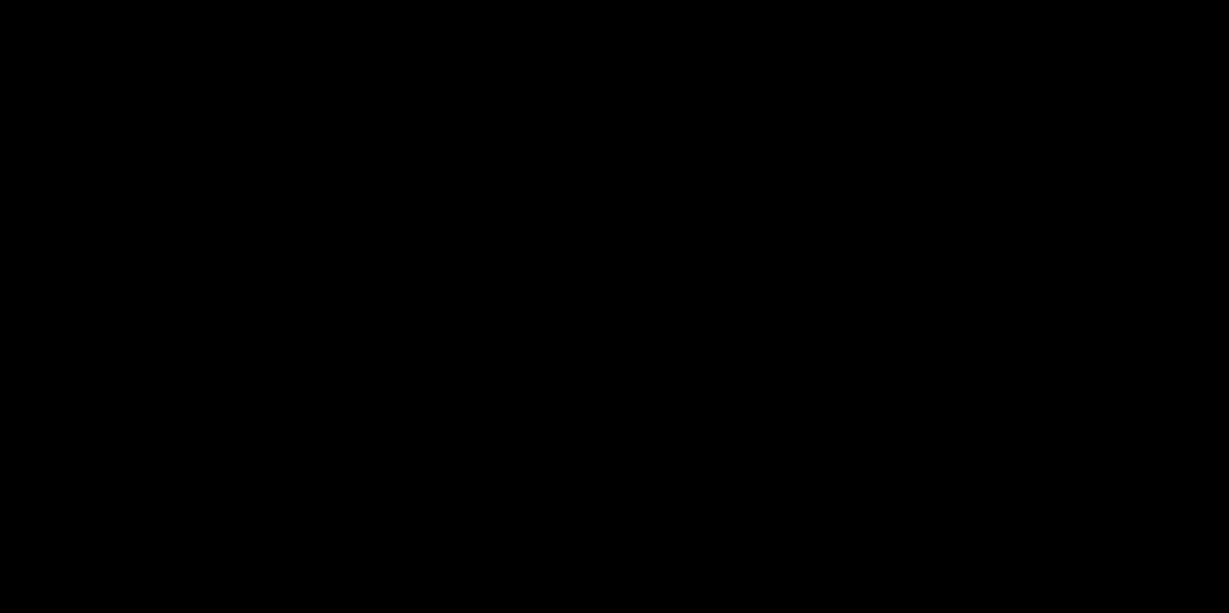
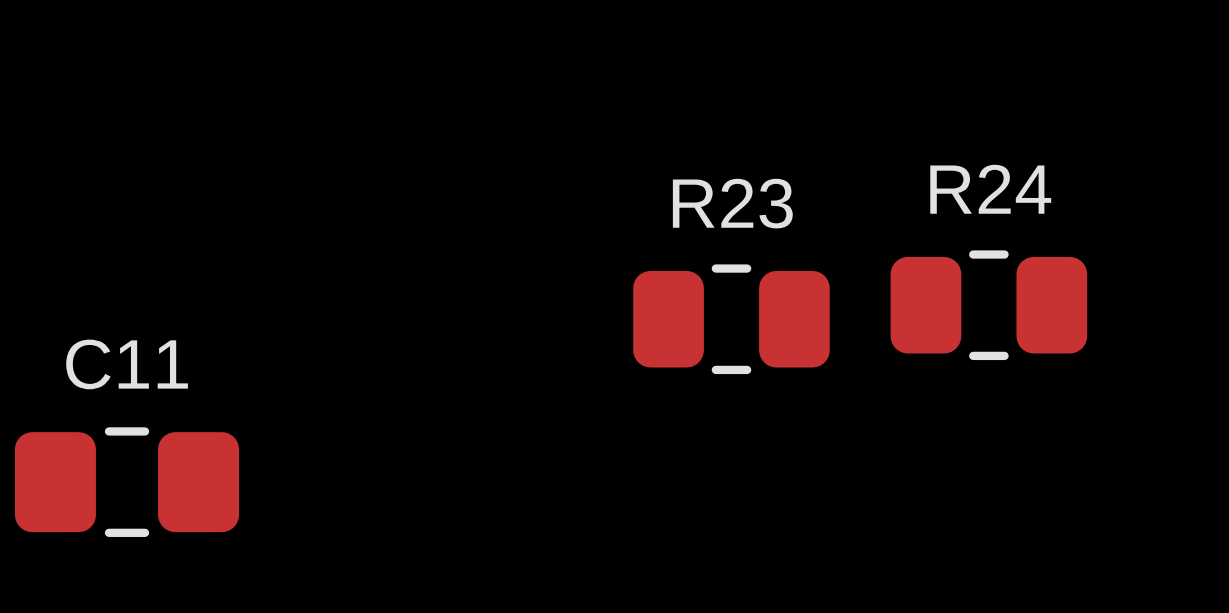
R24: none -> (988, 305)
R23: none -> (731, 319)
C11: none -> (126, 482)

